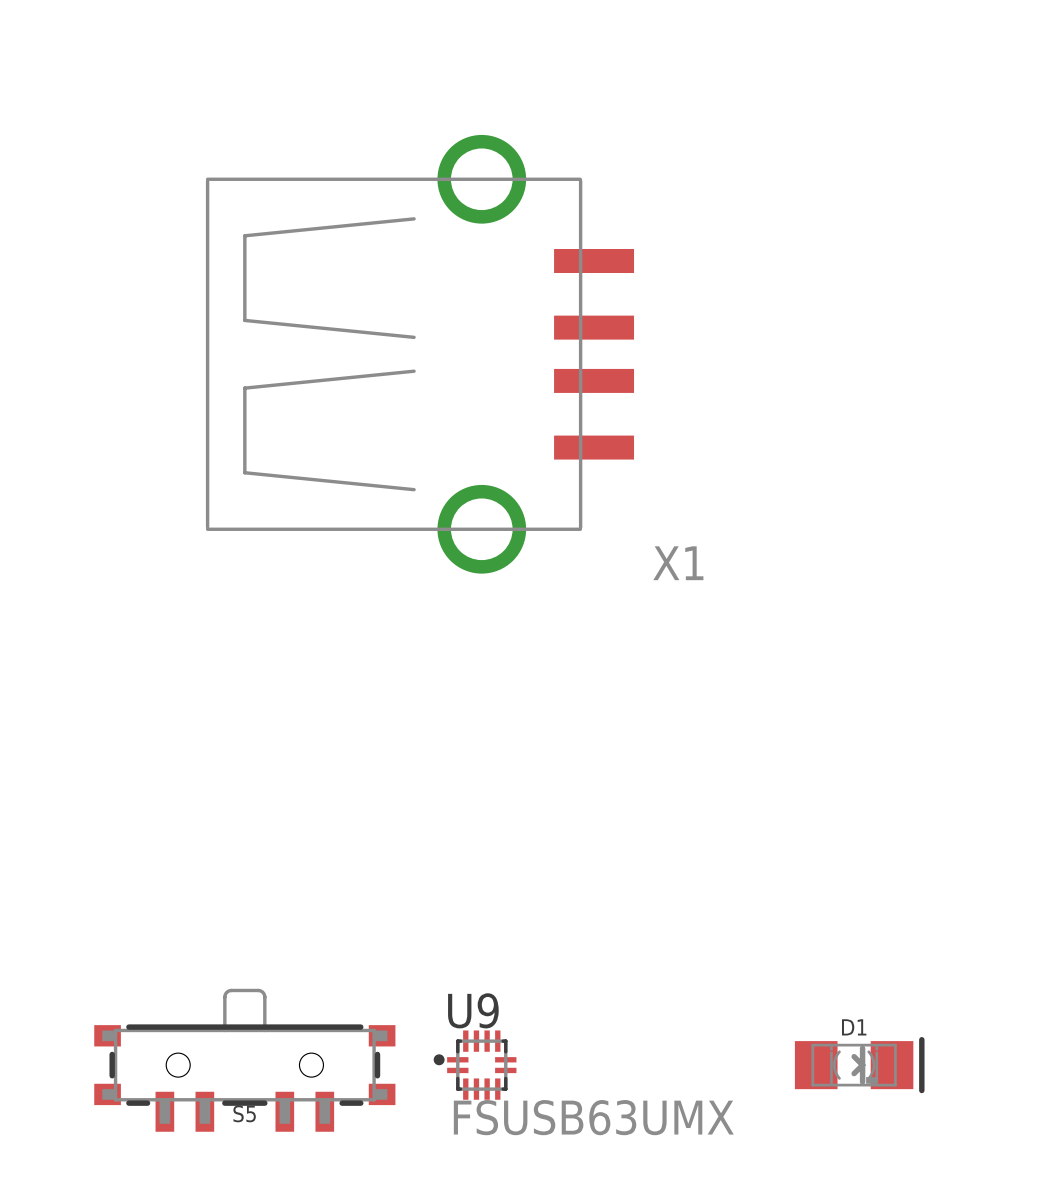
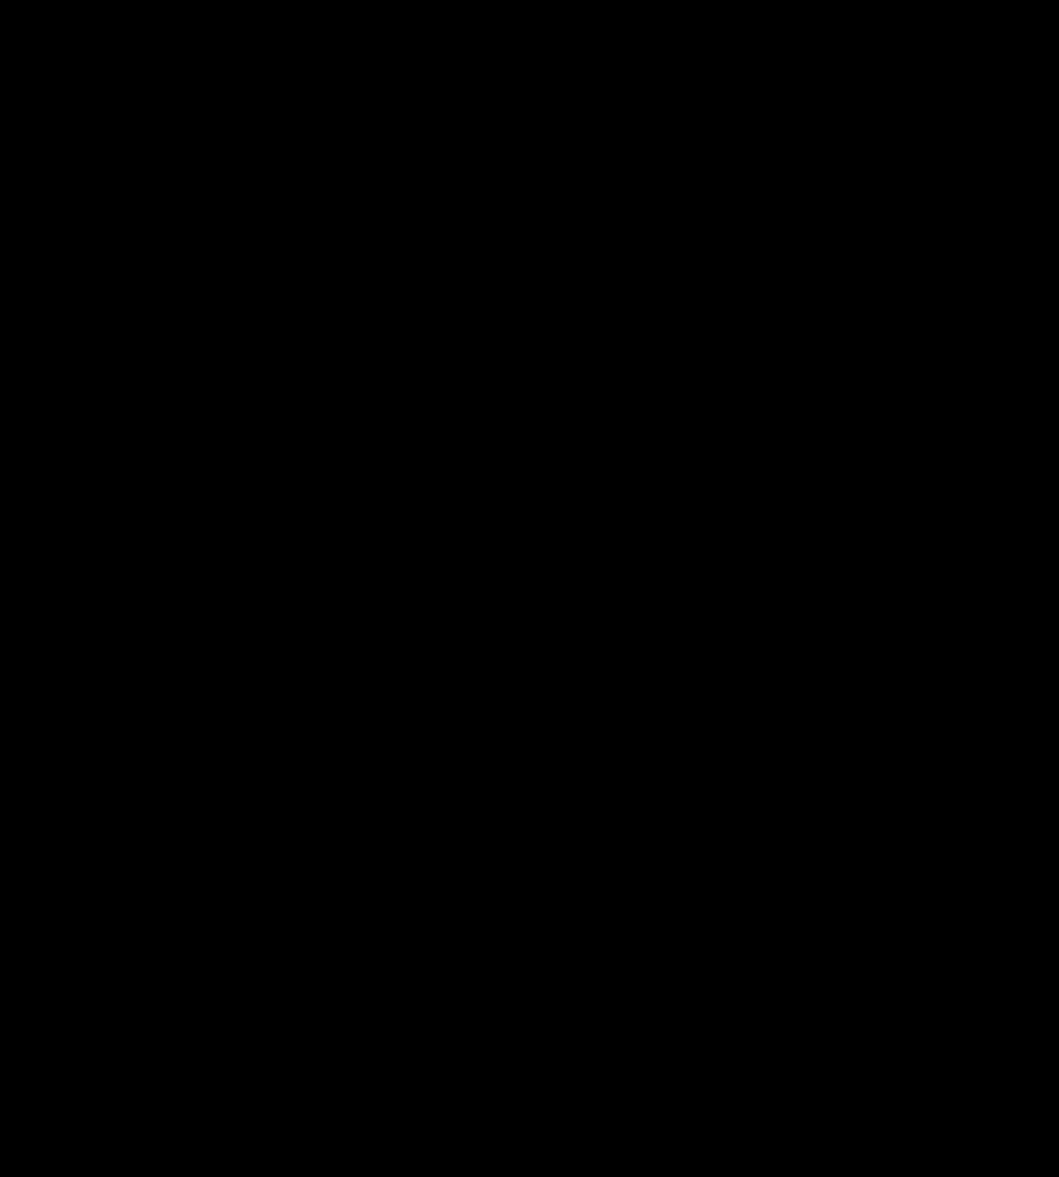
X1: (419, 354) -> none
S5: (244, 1060) -> none
U9: FSUSB63UMX (475, 1065) -> none
D1: (859, 1065) -> none

